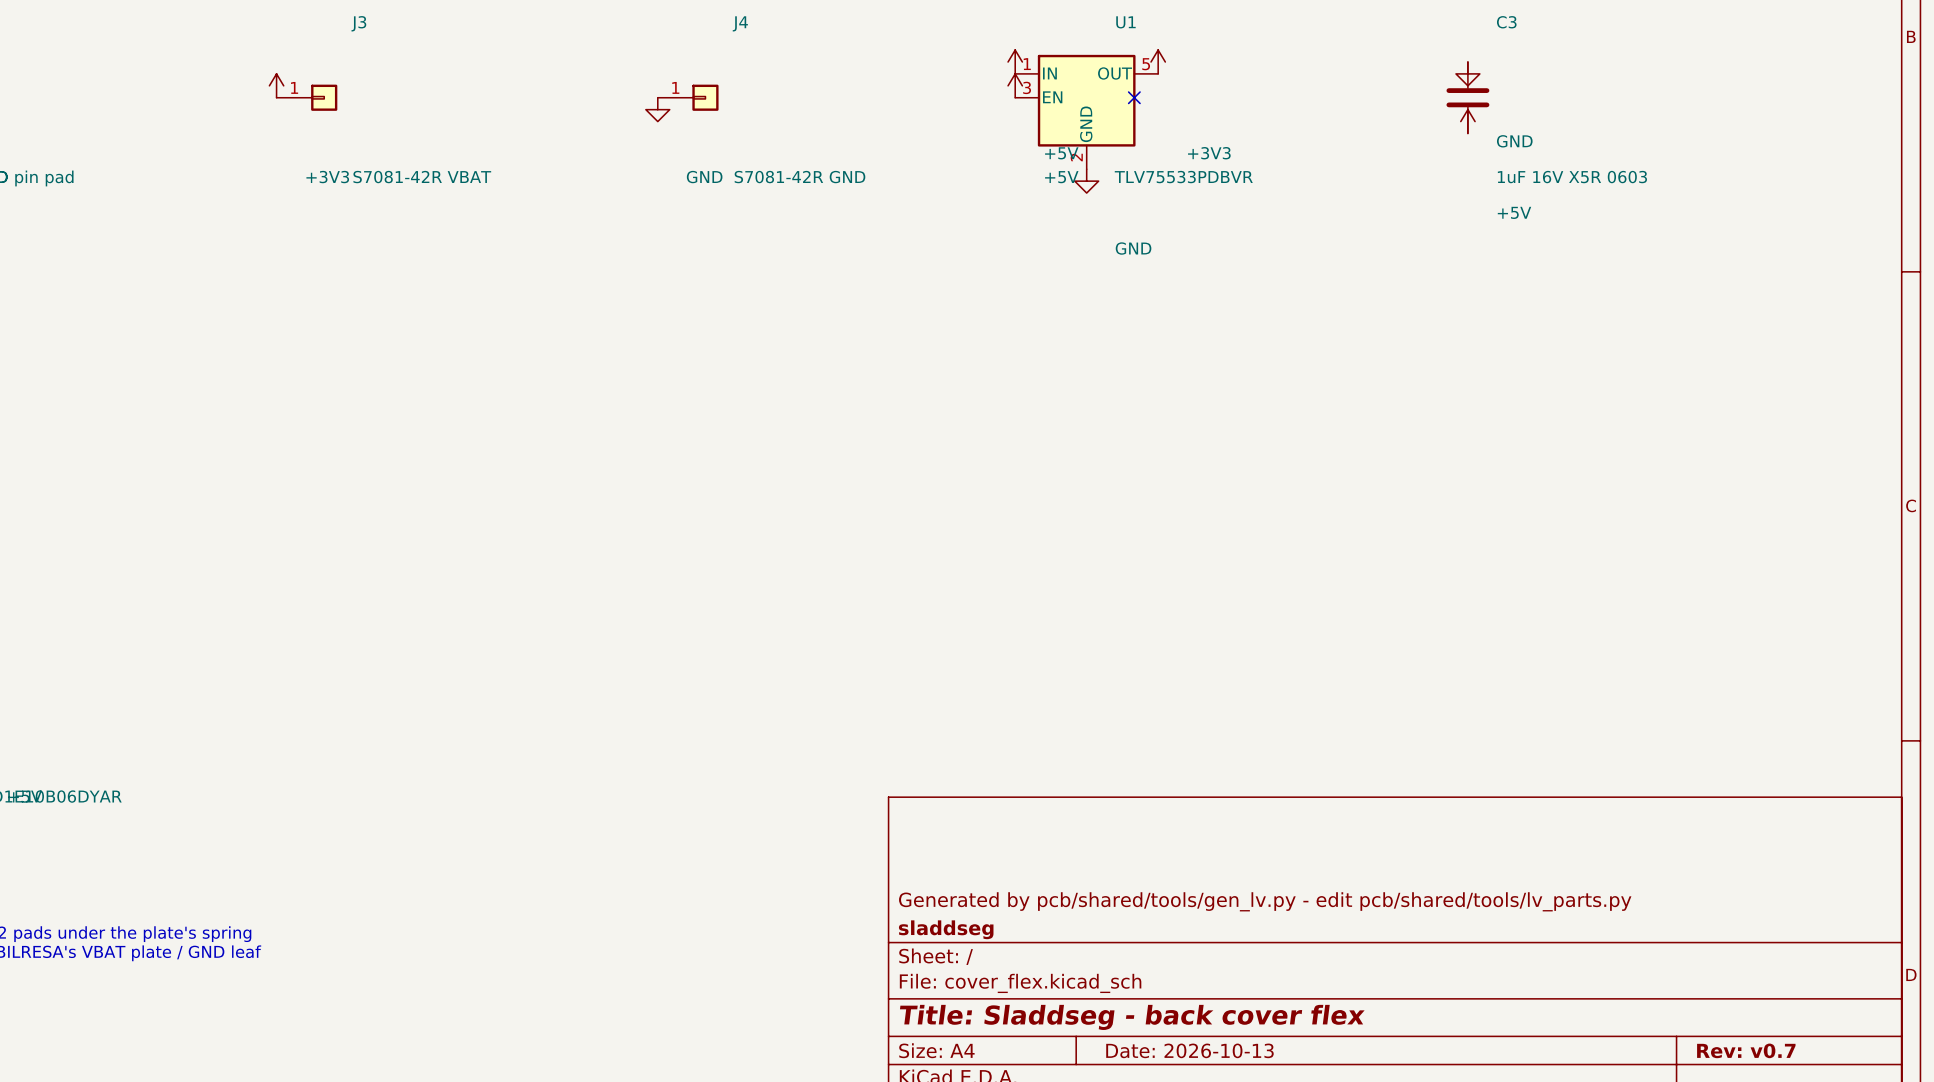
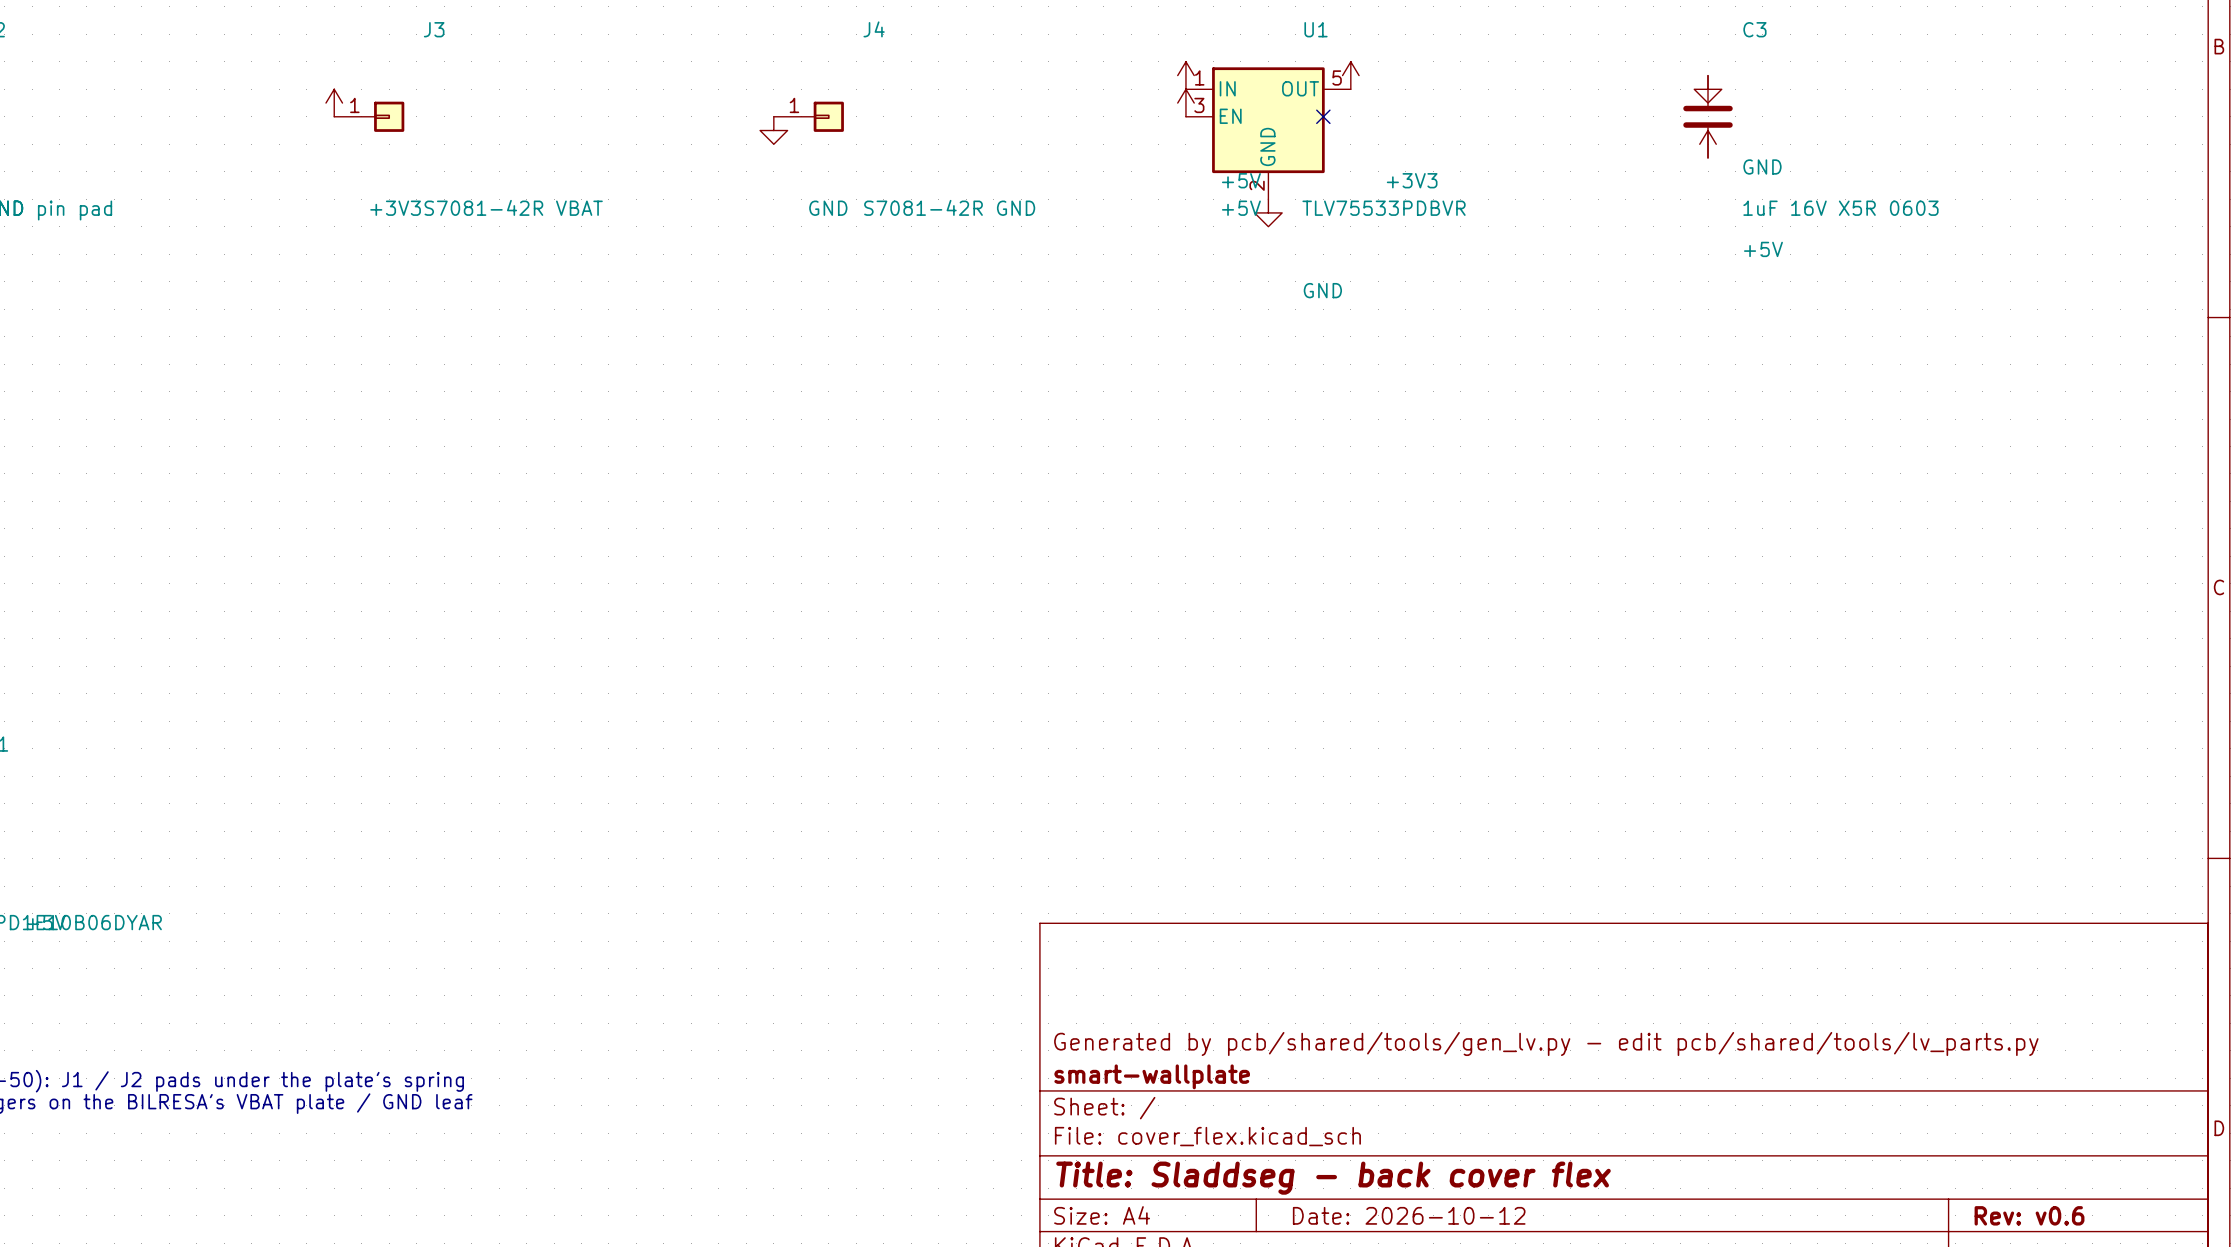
title block: sladdseg (946, 929) -> smart-wallplate (1152, 1076)
title block: Date: 2026-10-13 (1189, 1050) -> Date: 2026-10-12 (1409, 1215)
title block: Rev: v0.7 (1746, 1050) -> Rev: v0.6 (2029, 1215)

